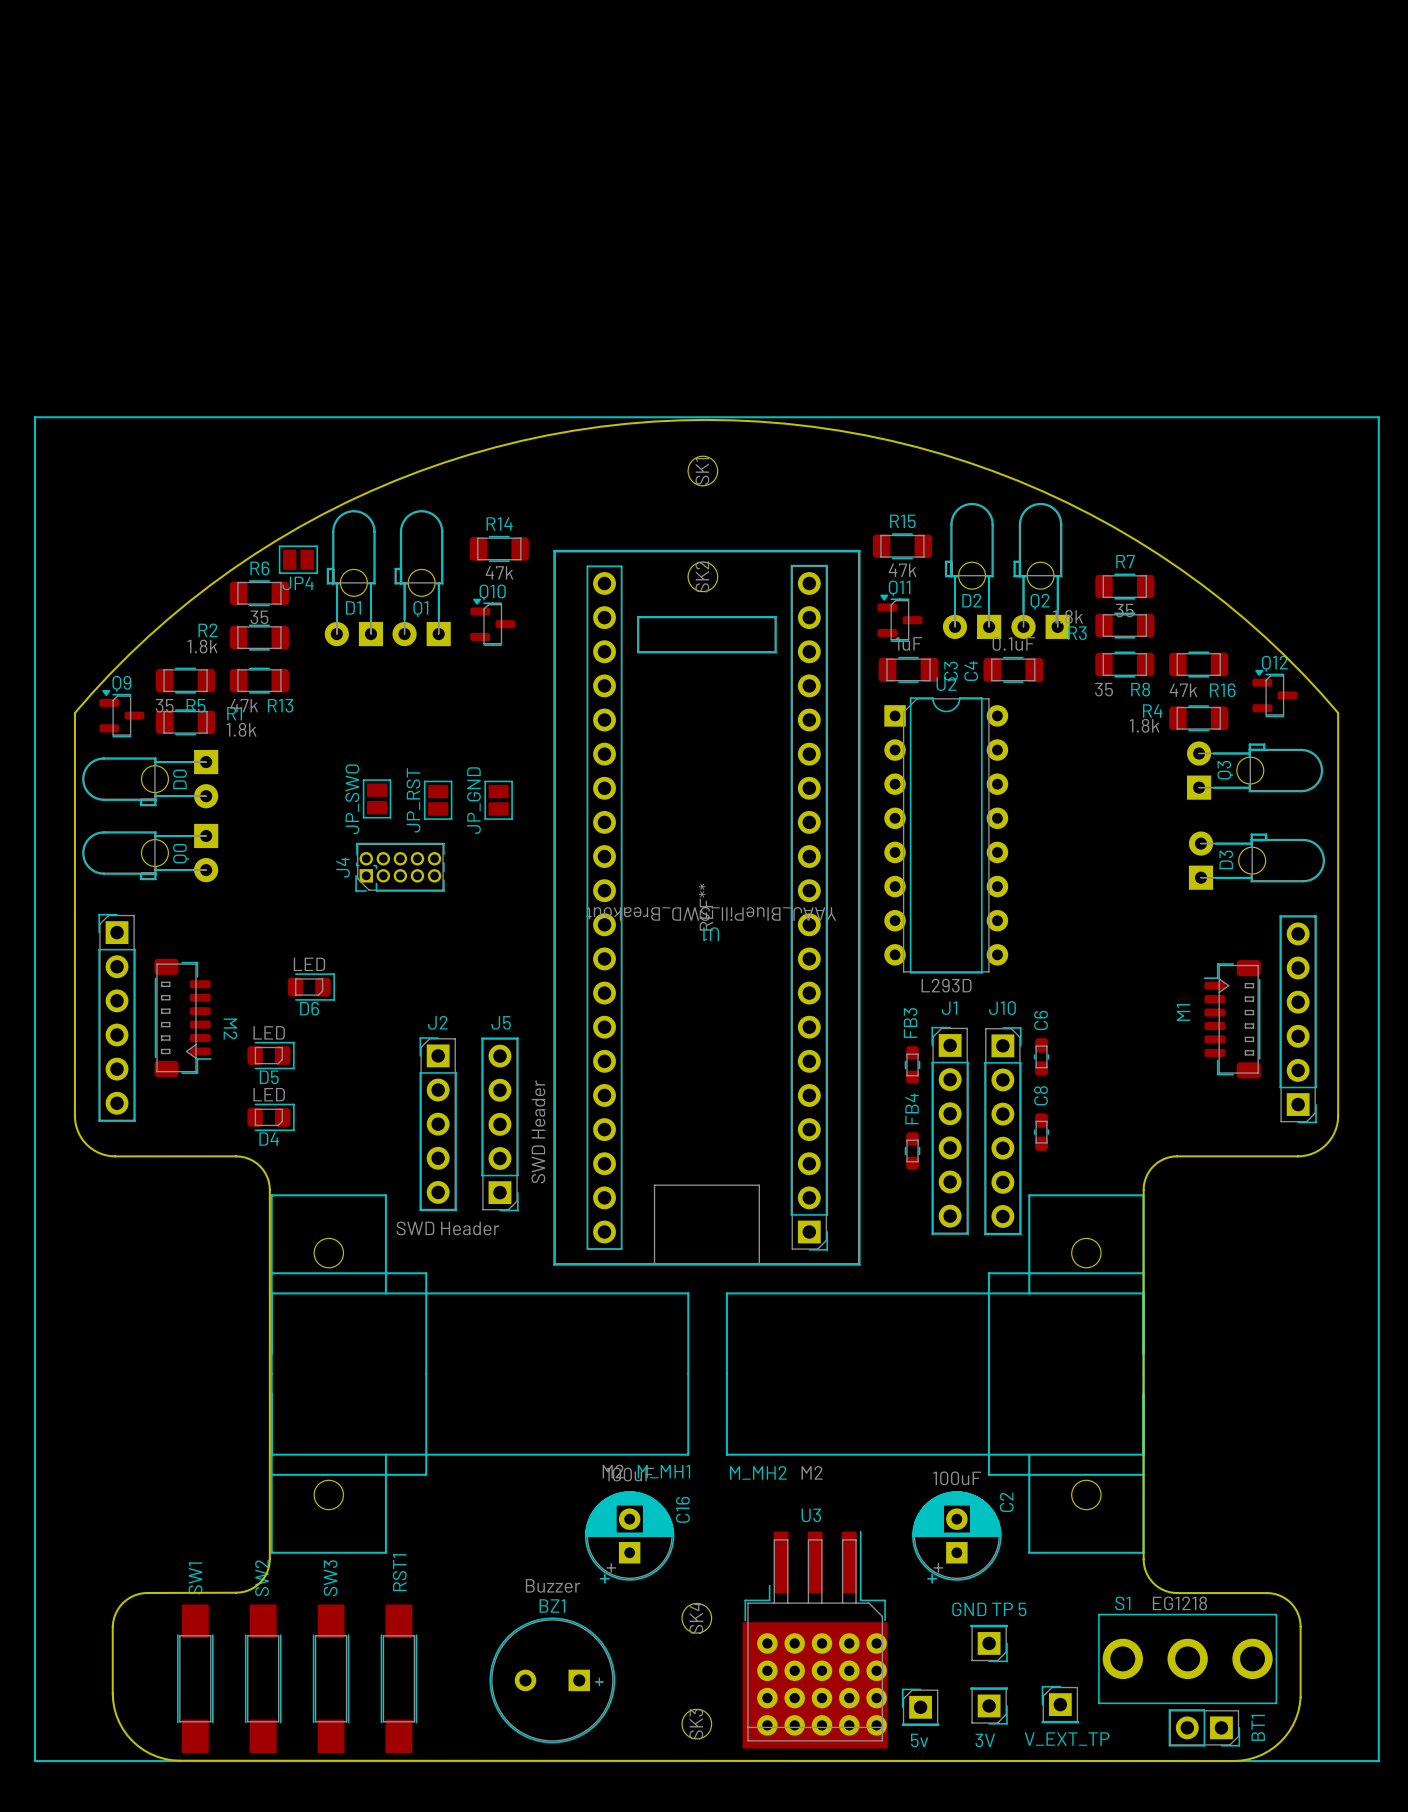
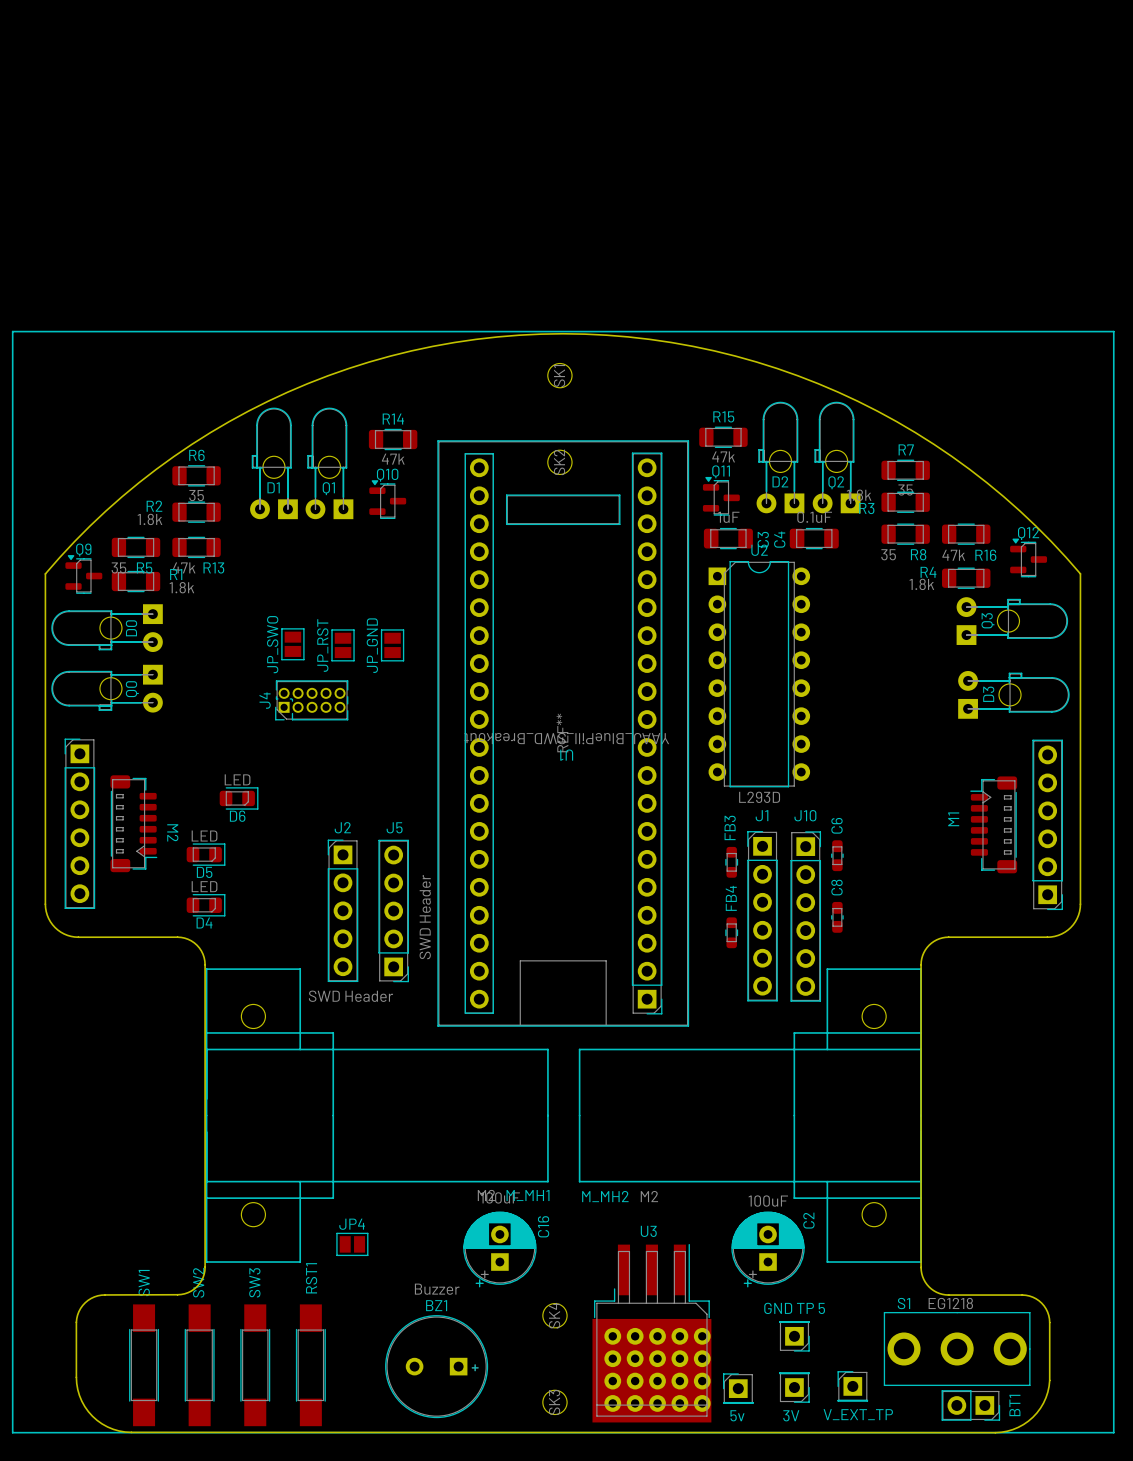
JP4 position: (298, 559) -> (352, 1244)
JP4 name position: JP4 (298, 583) -> JP4 (352, 1224)

